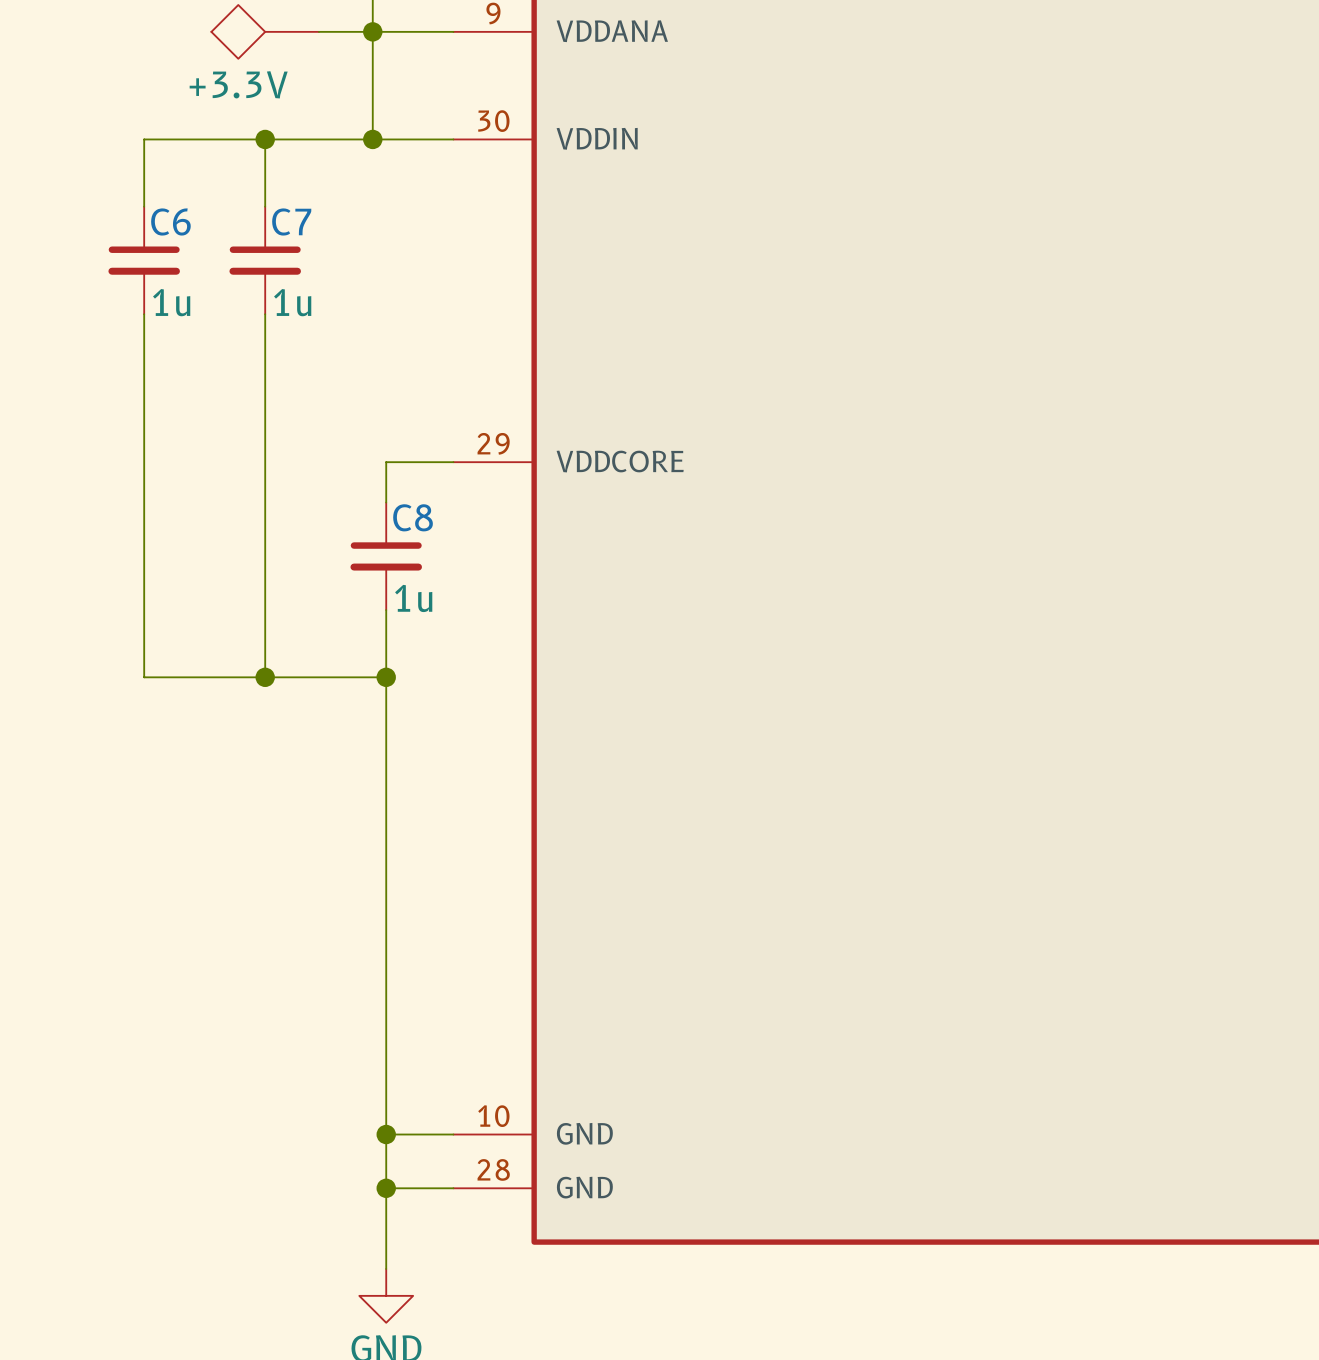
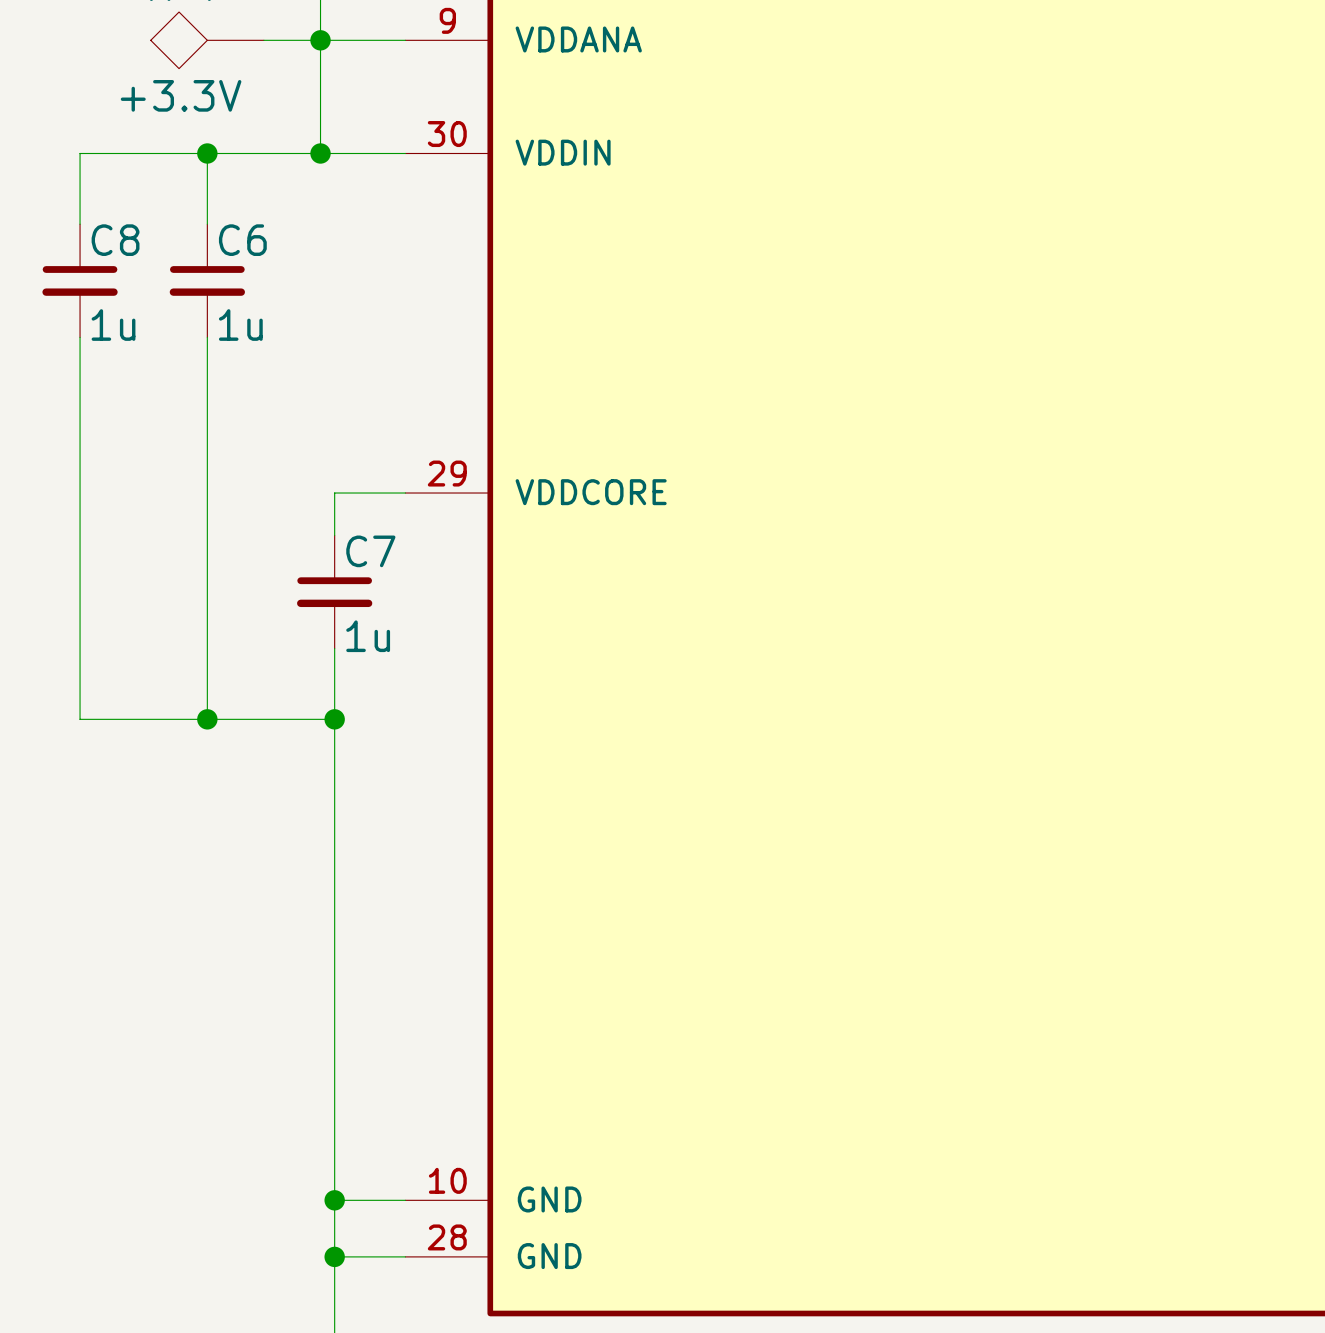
C6 name: C6 (170, 221) -> C8 (115, 240)
C7 name: C7 (291, 221) -> C6 (242, 240)
C8 name: C8 (413, 517) -> C7 (370, 551)

